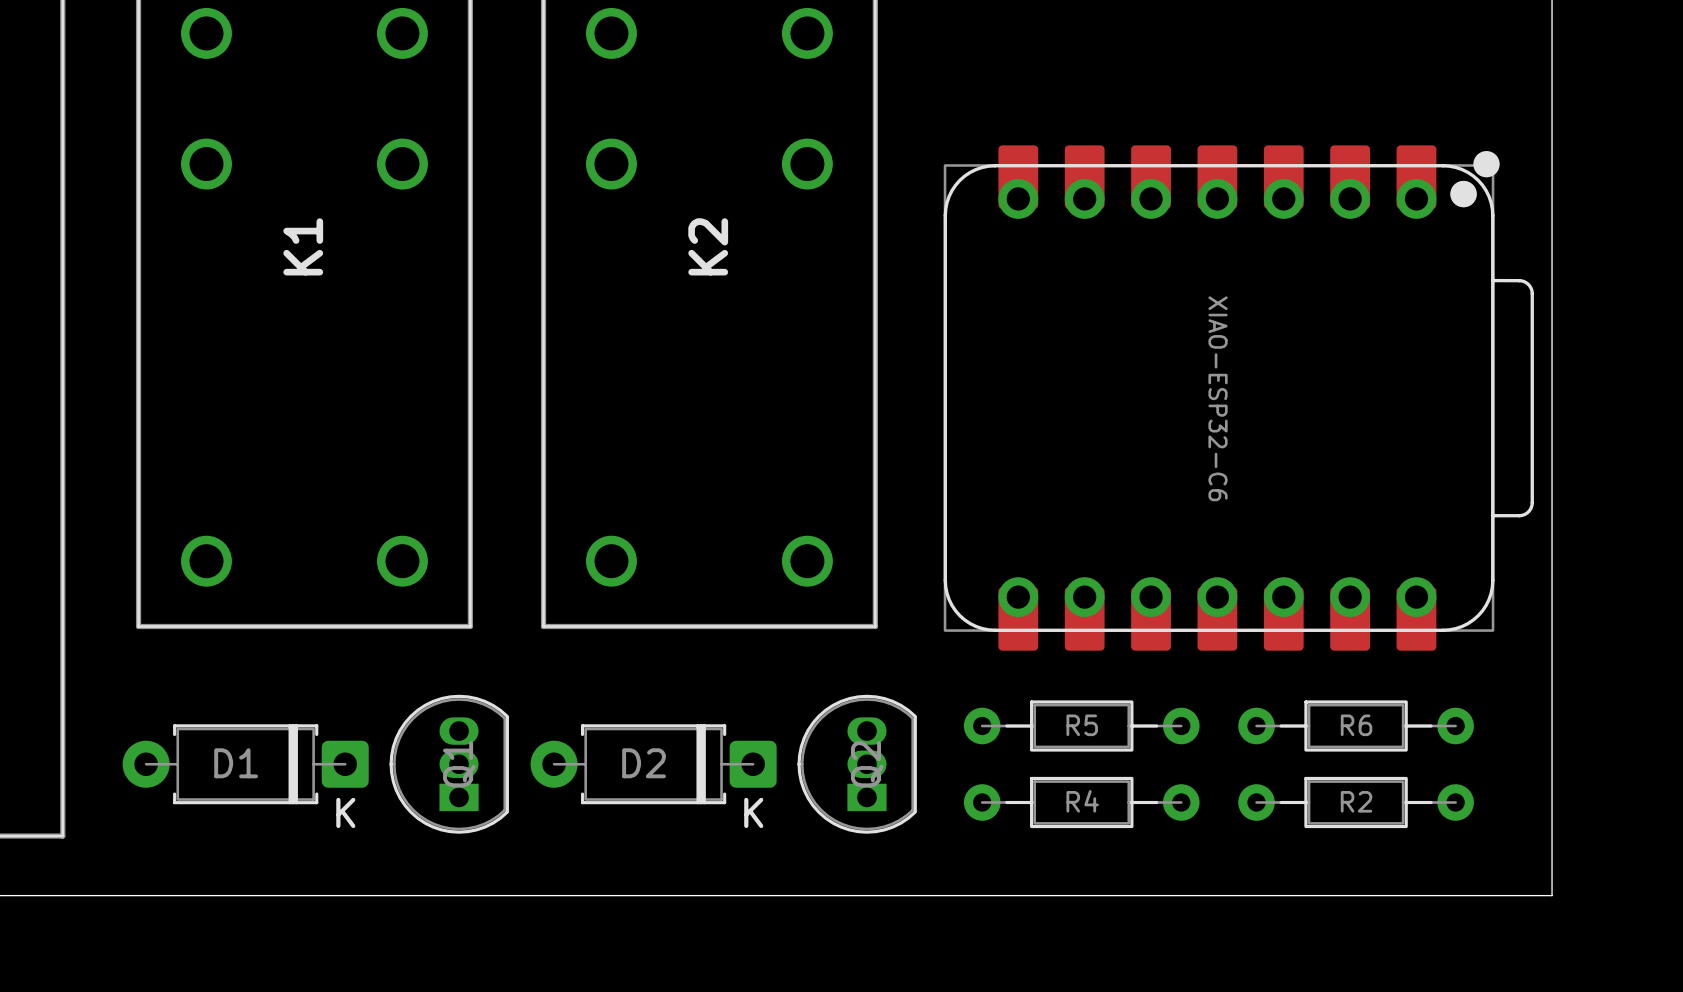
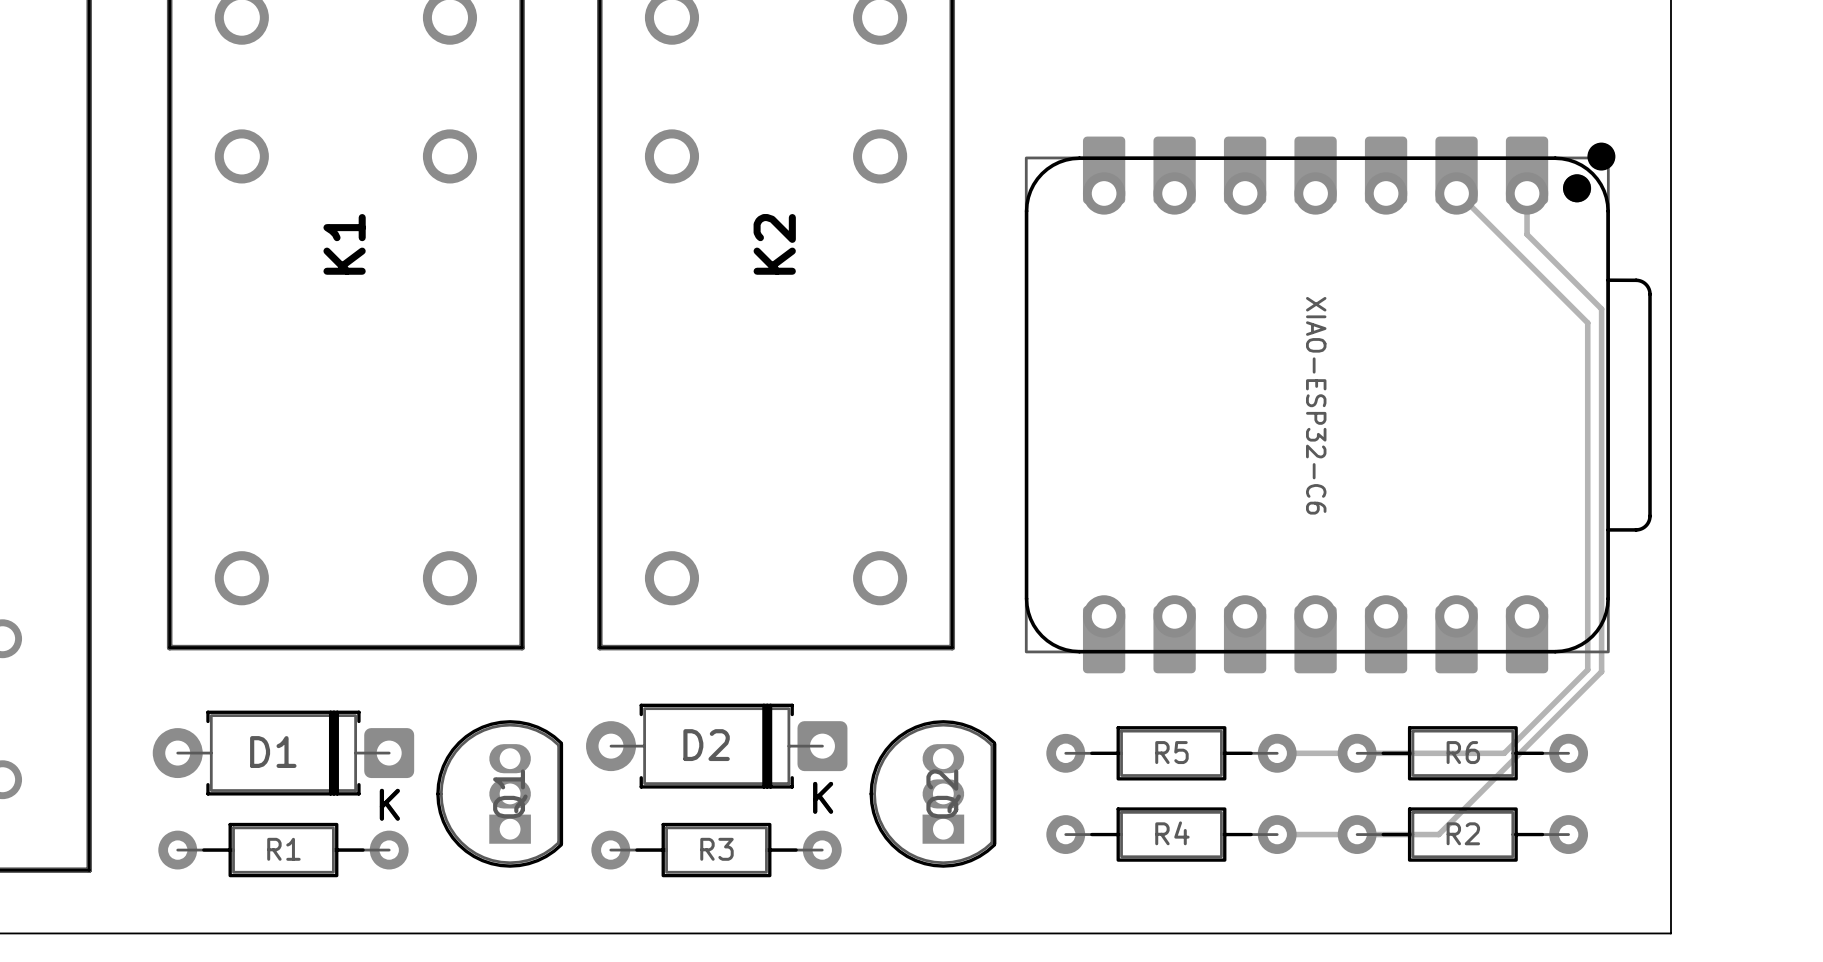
track: none -> (1456, 191) (1587, 322) (1587, 669) (1504, 753) (1277, 753)
track: none -> (1527, 193) (1527, 234) (1601, 309) (1601, 671) (1438, 834) (1277, 834)
D1 position: (245, 764) -> (283, 753)
D2 position: (653, 764) -> (716, 746)
R1: none -> (283, 850)
R3: none -> (716, 850)

